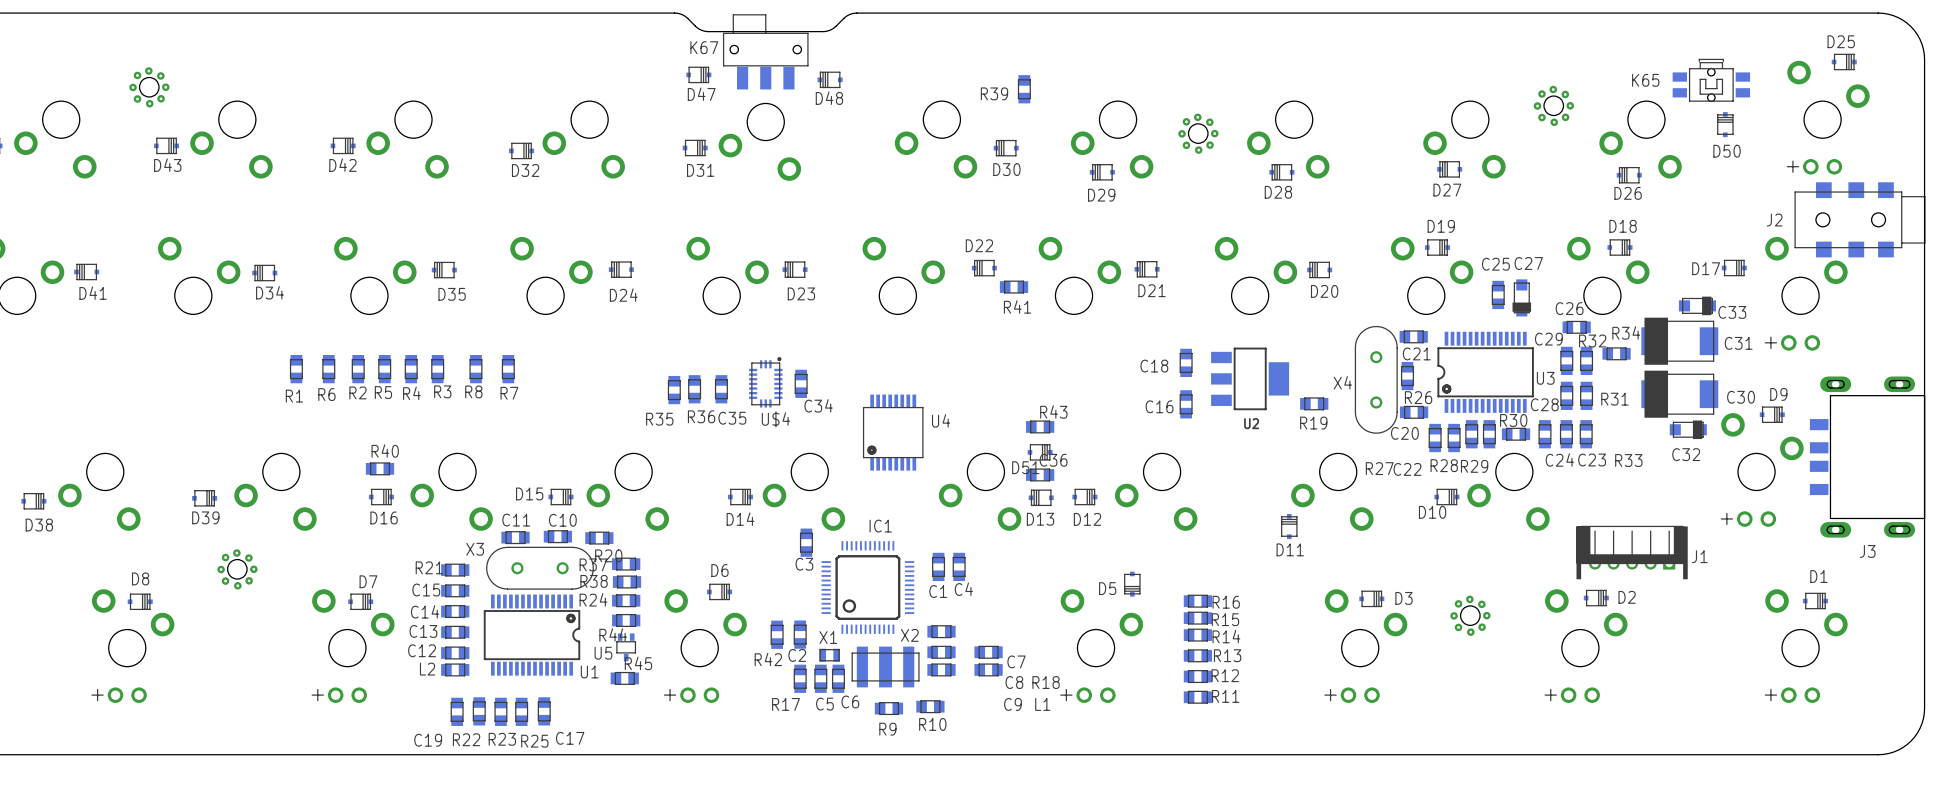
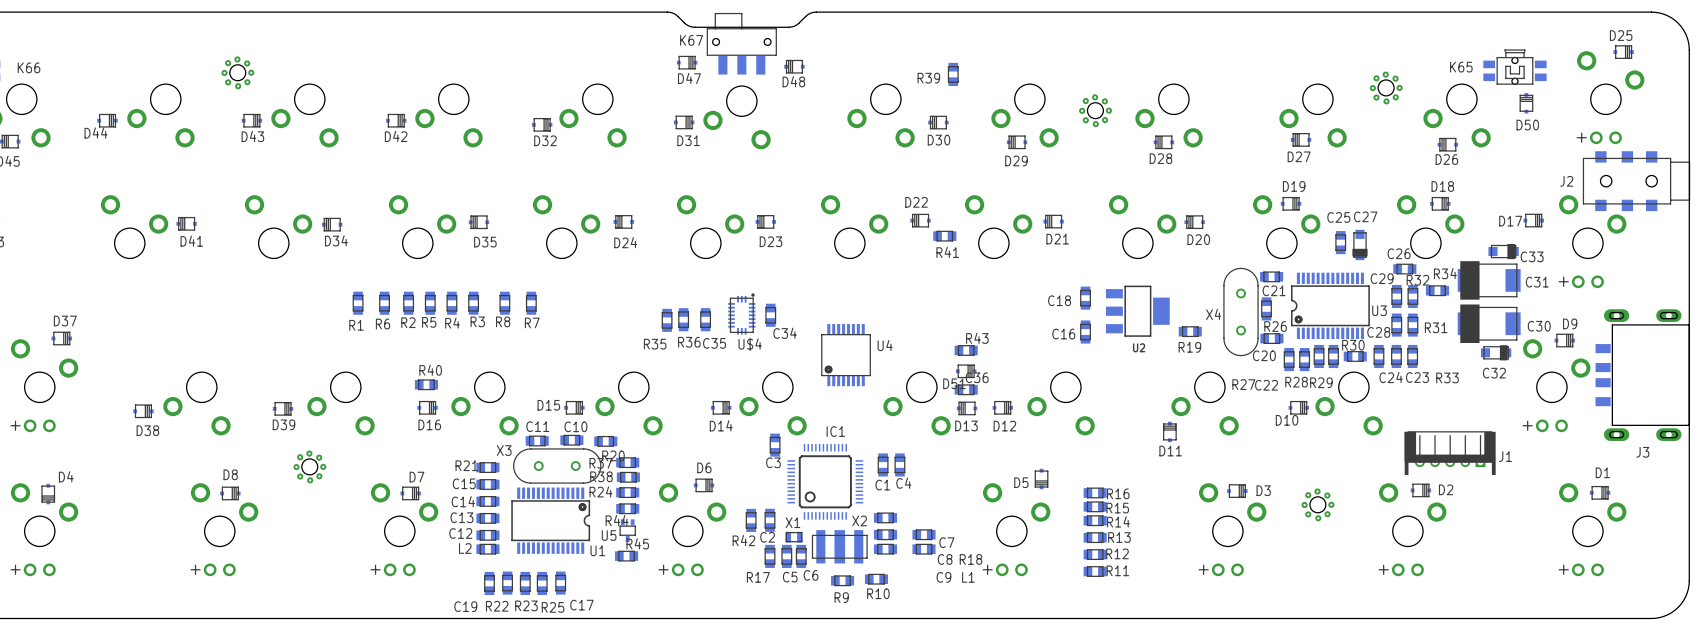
J2 footprint: [1794, 182, 1926, 258] -> [1582, 151, 1691, 212]

